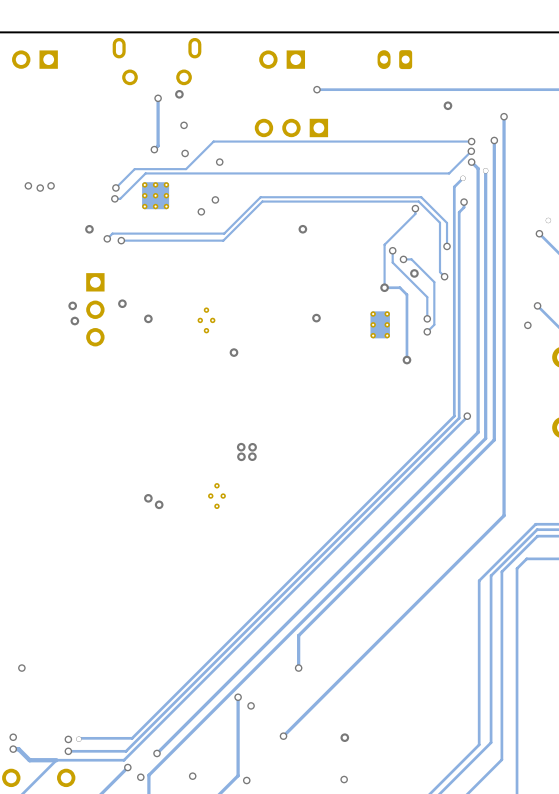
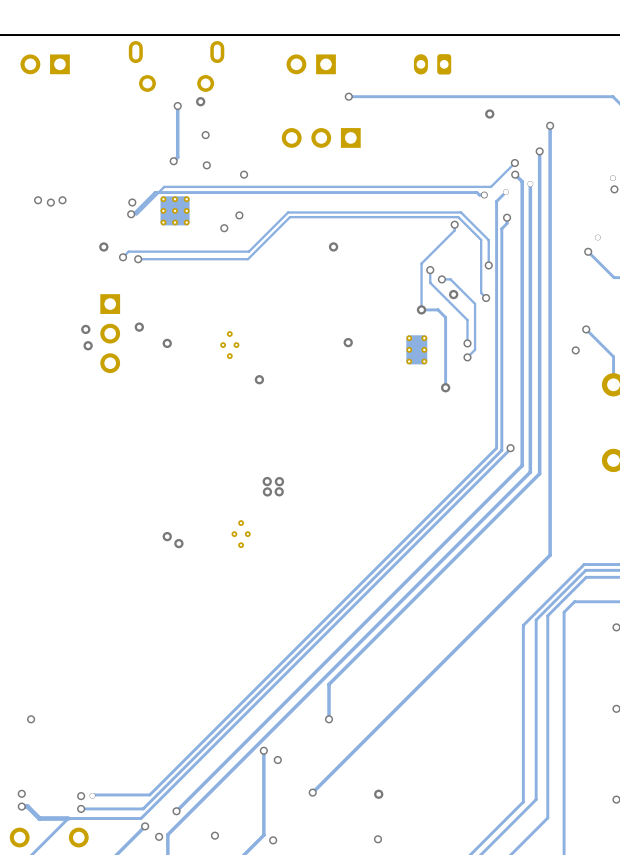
track: (471, 141) (213, 141) (186, 169) (134, 169) (115, 187) -> none
via: (471, 141) -> none
track: none -> (484, 195) (479, 195) (476, 192) (155, 192) (132, 215)
via: none -> (484, 195)

